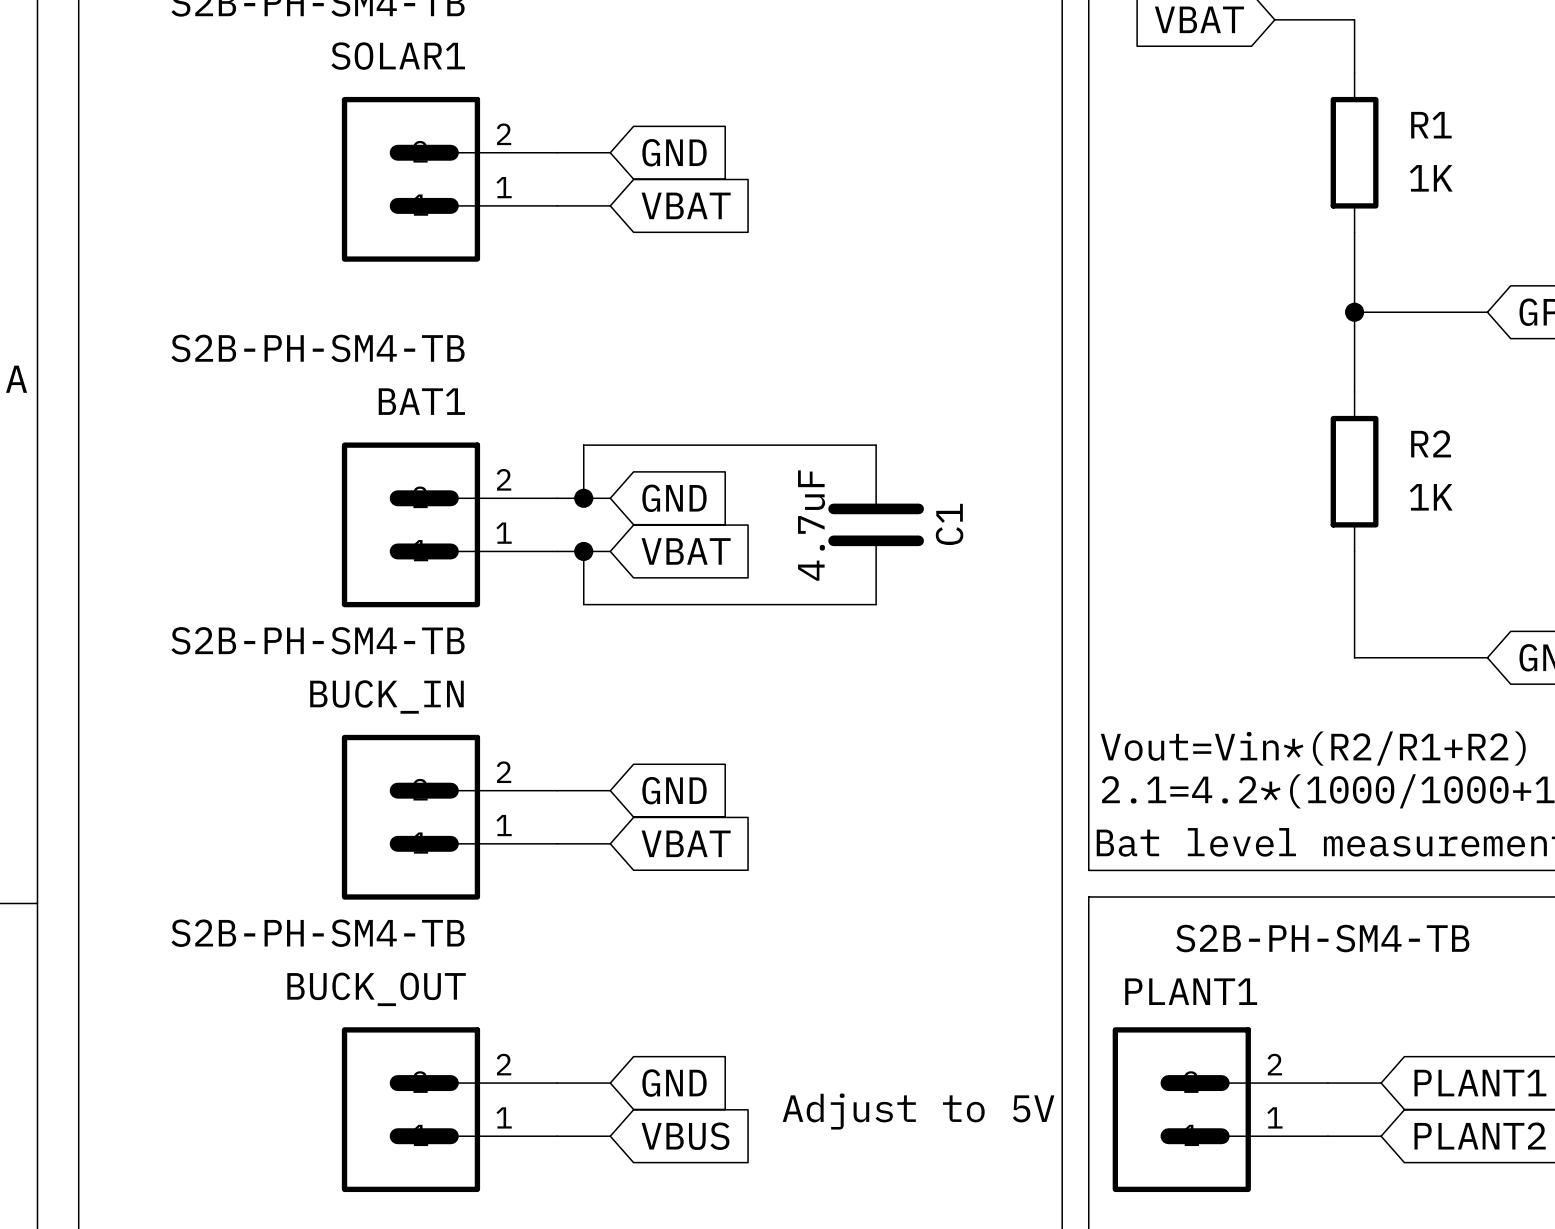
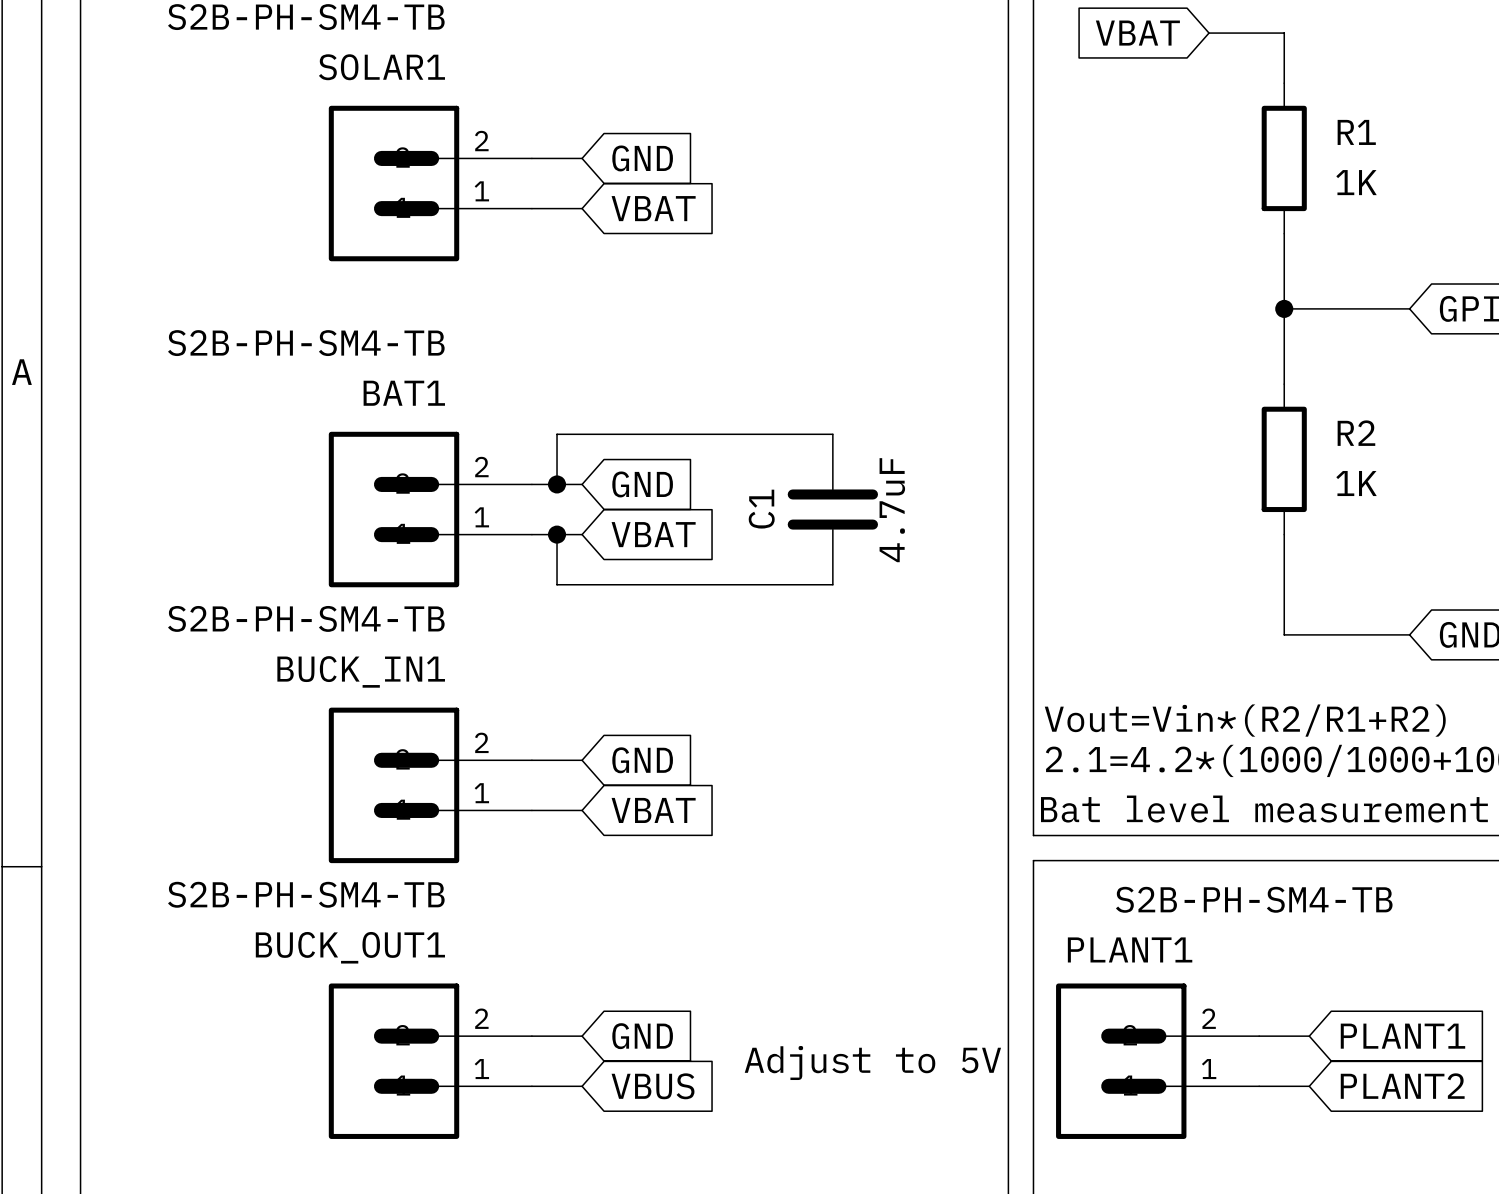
C1 name position: C1 (949, 524) -> C1 (761, 509)
C1 value position: 4.7uF (811, 525) -> 4.7uF (892, 510)
BUCK_IN name: BUCK_IN (386, 696) -> BUCK_IN1 (361, 671)
BUCK_OUT name: BUCK_OUT (376, 989) -> BUCK_OUT1 (350, 947)

